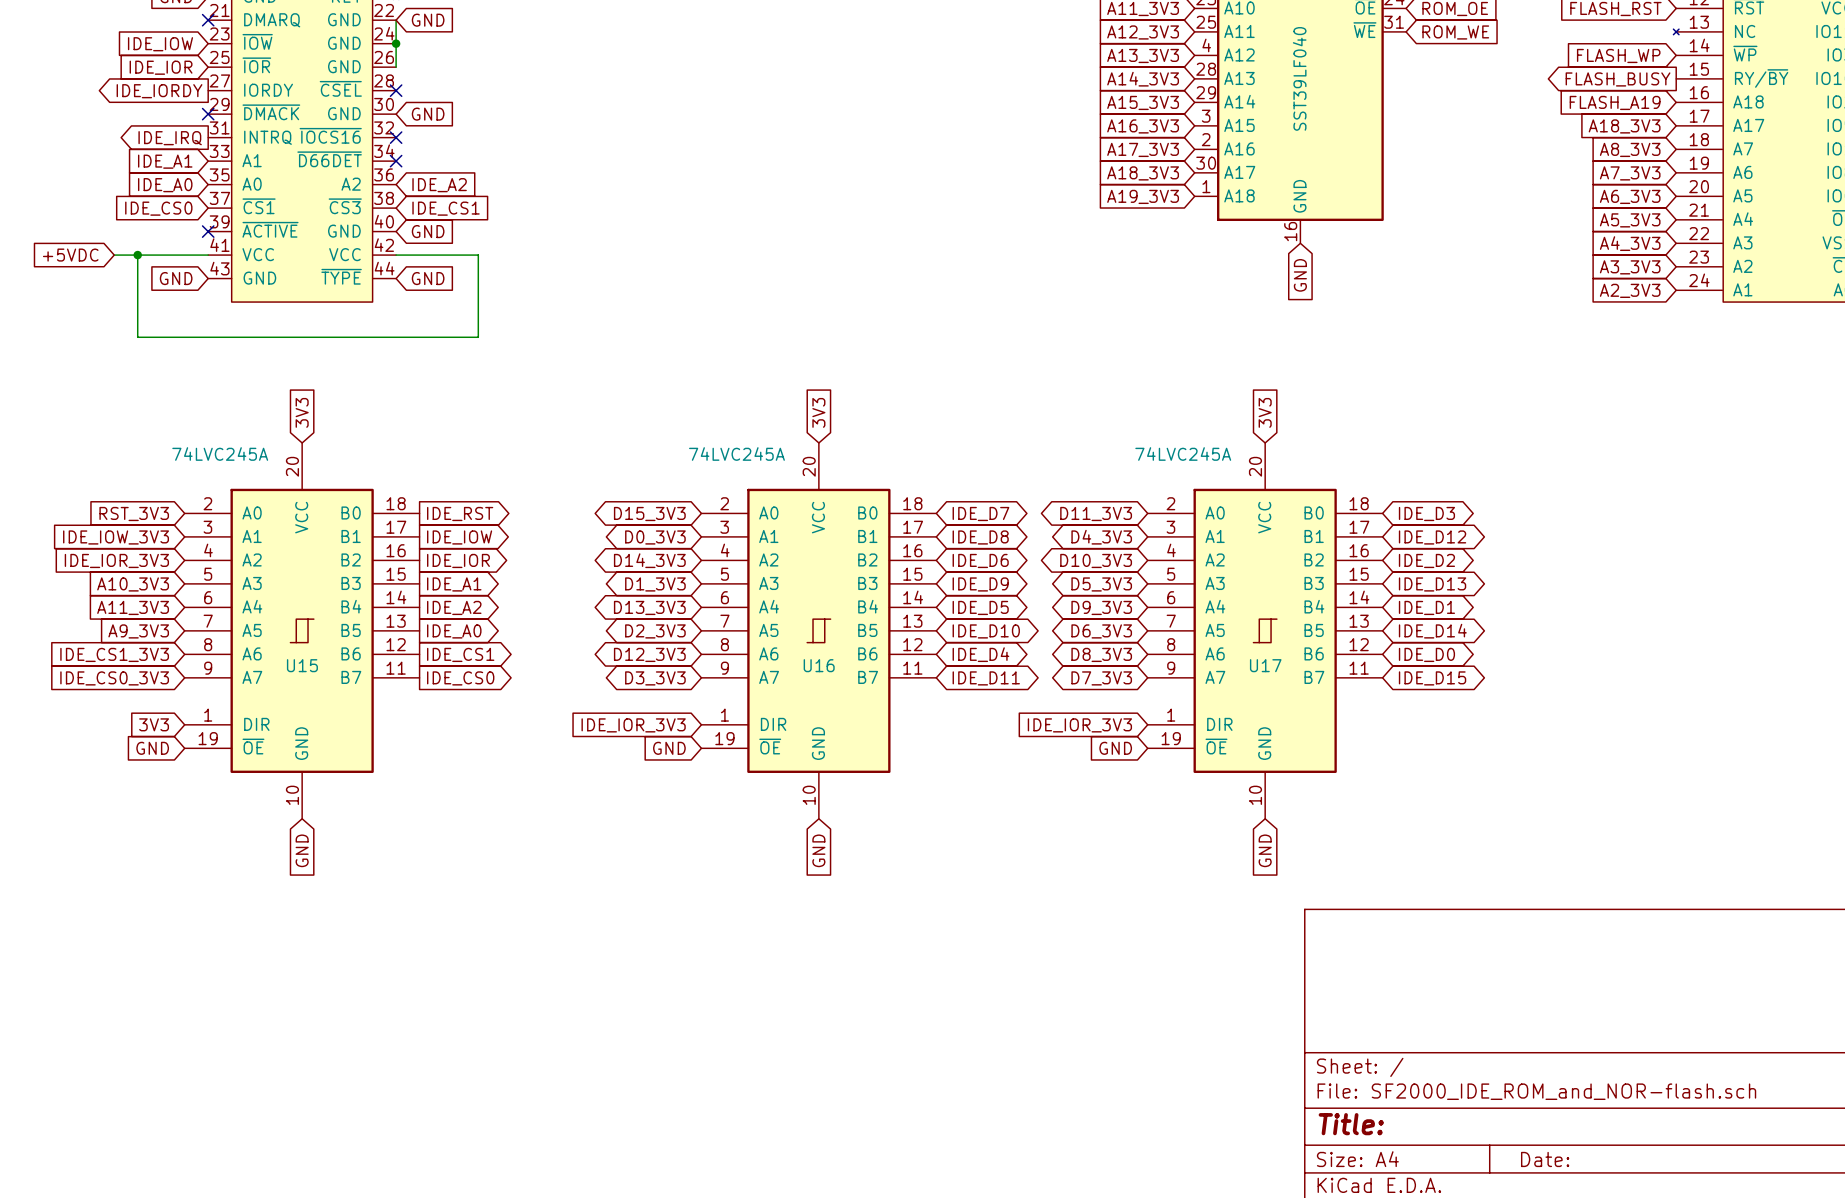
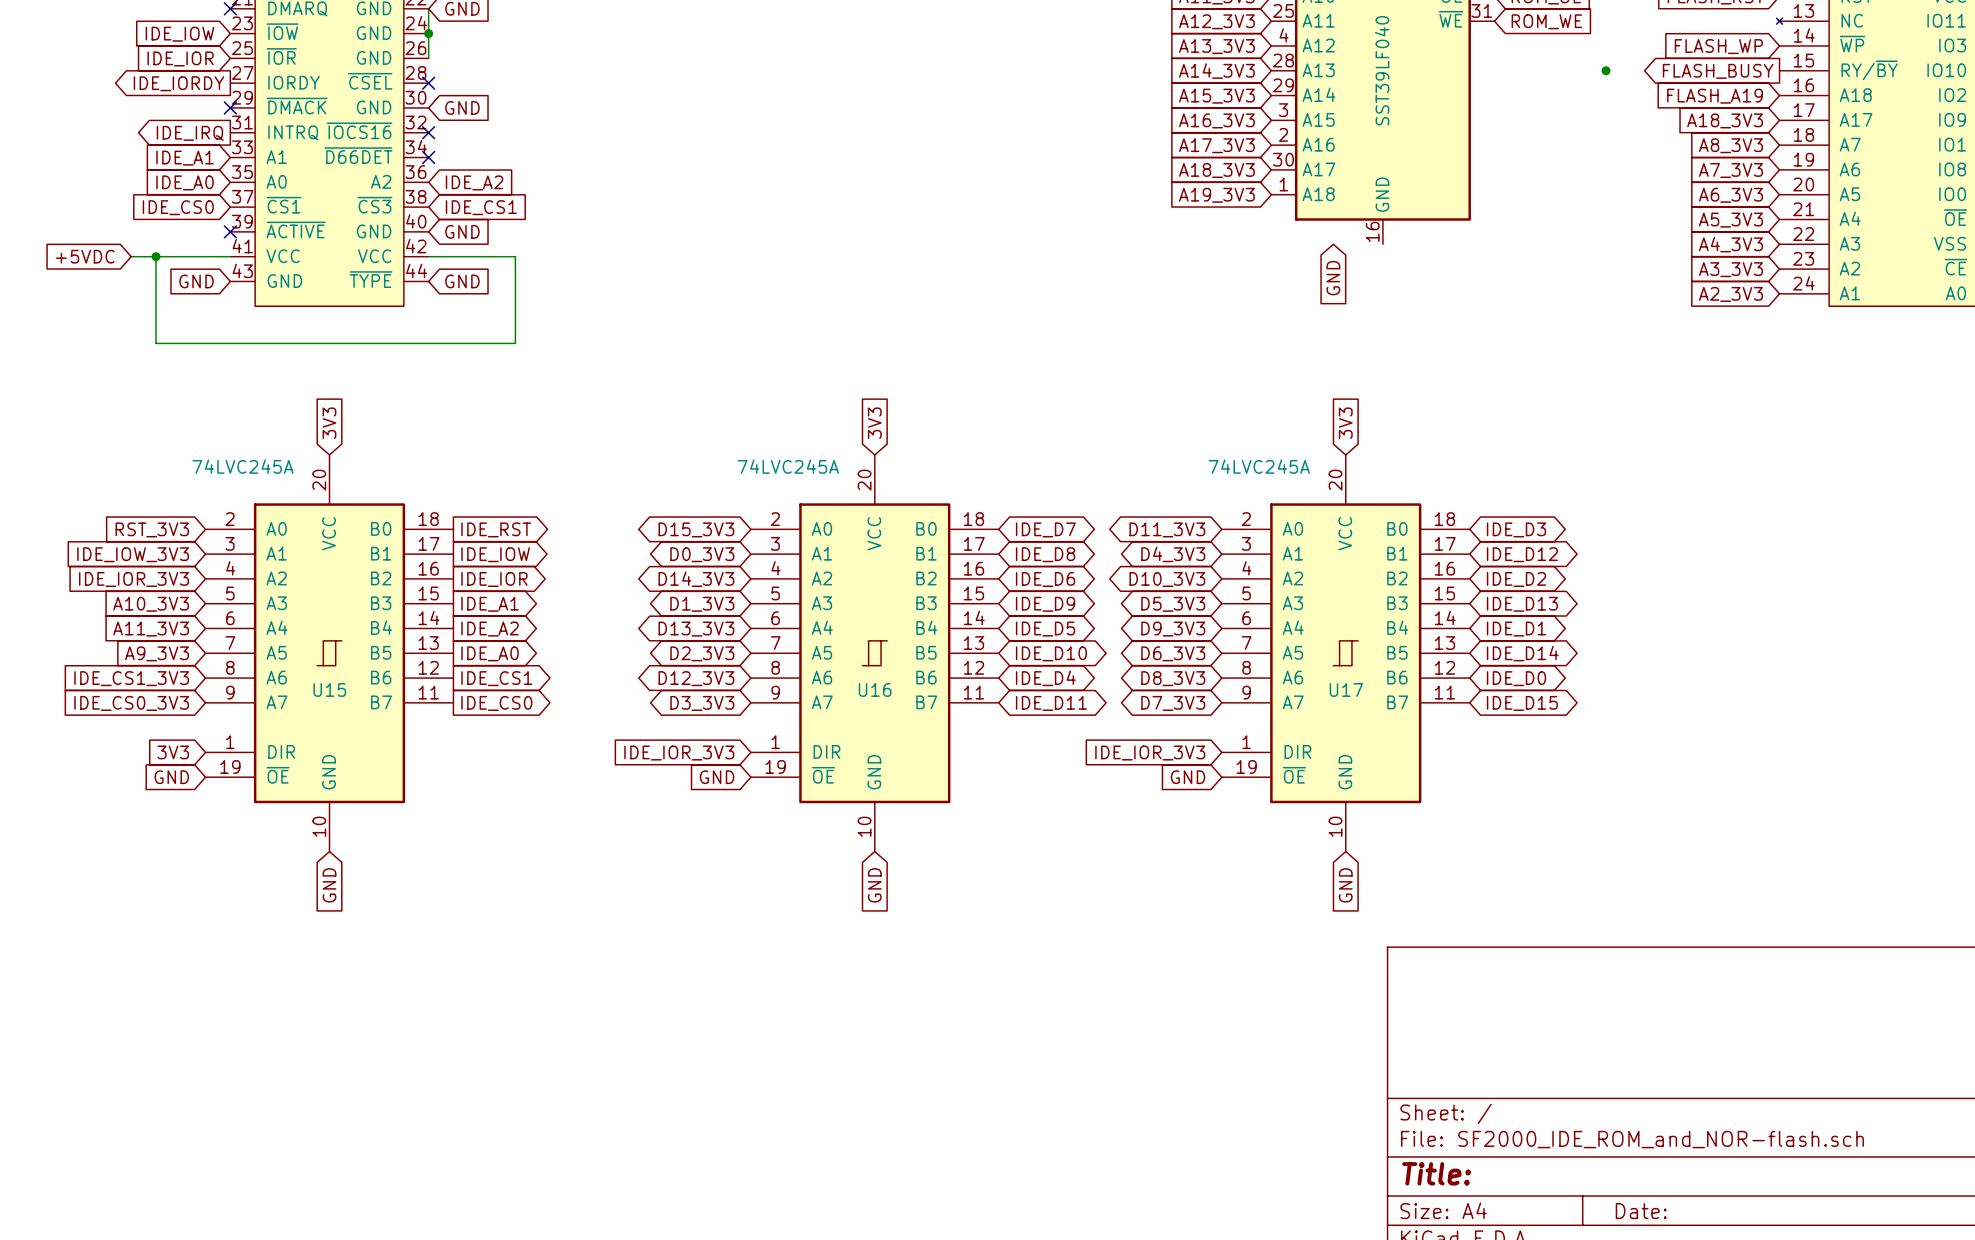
junction: none -> (1606, 70)
global label position: GND (1300, 275) -> GND (1333, 278)

